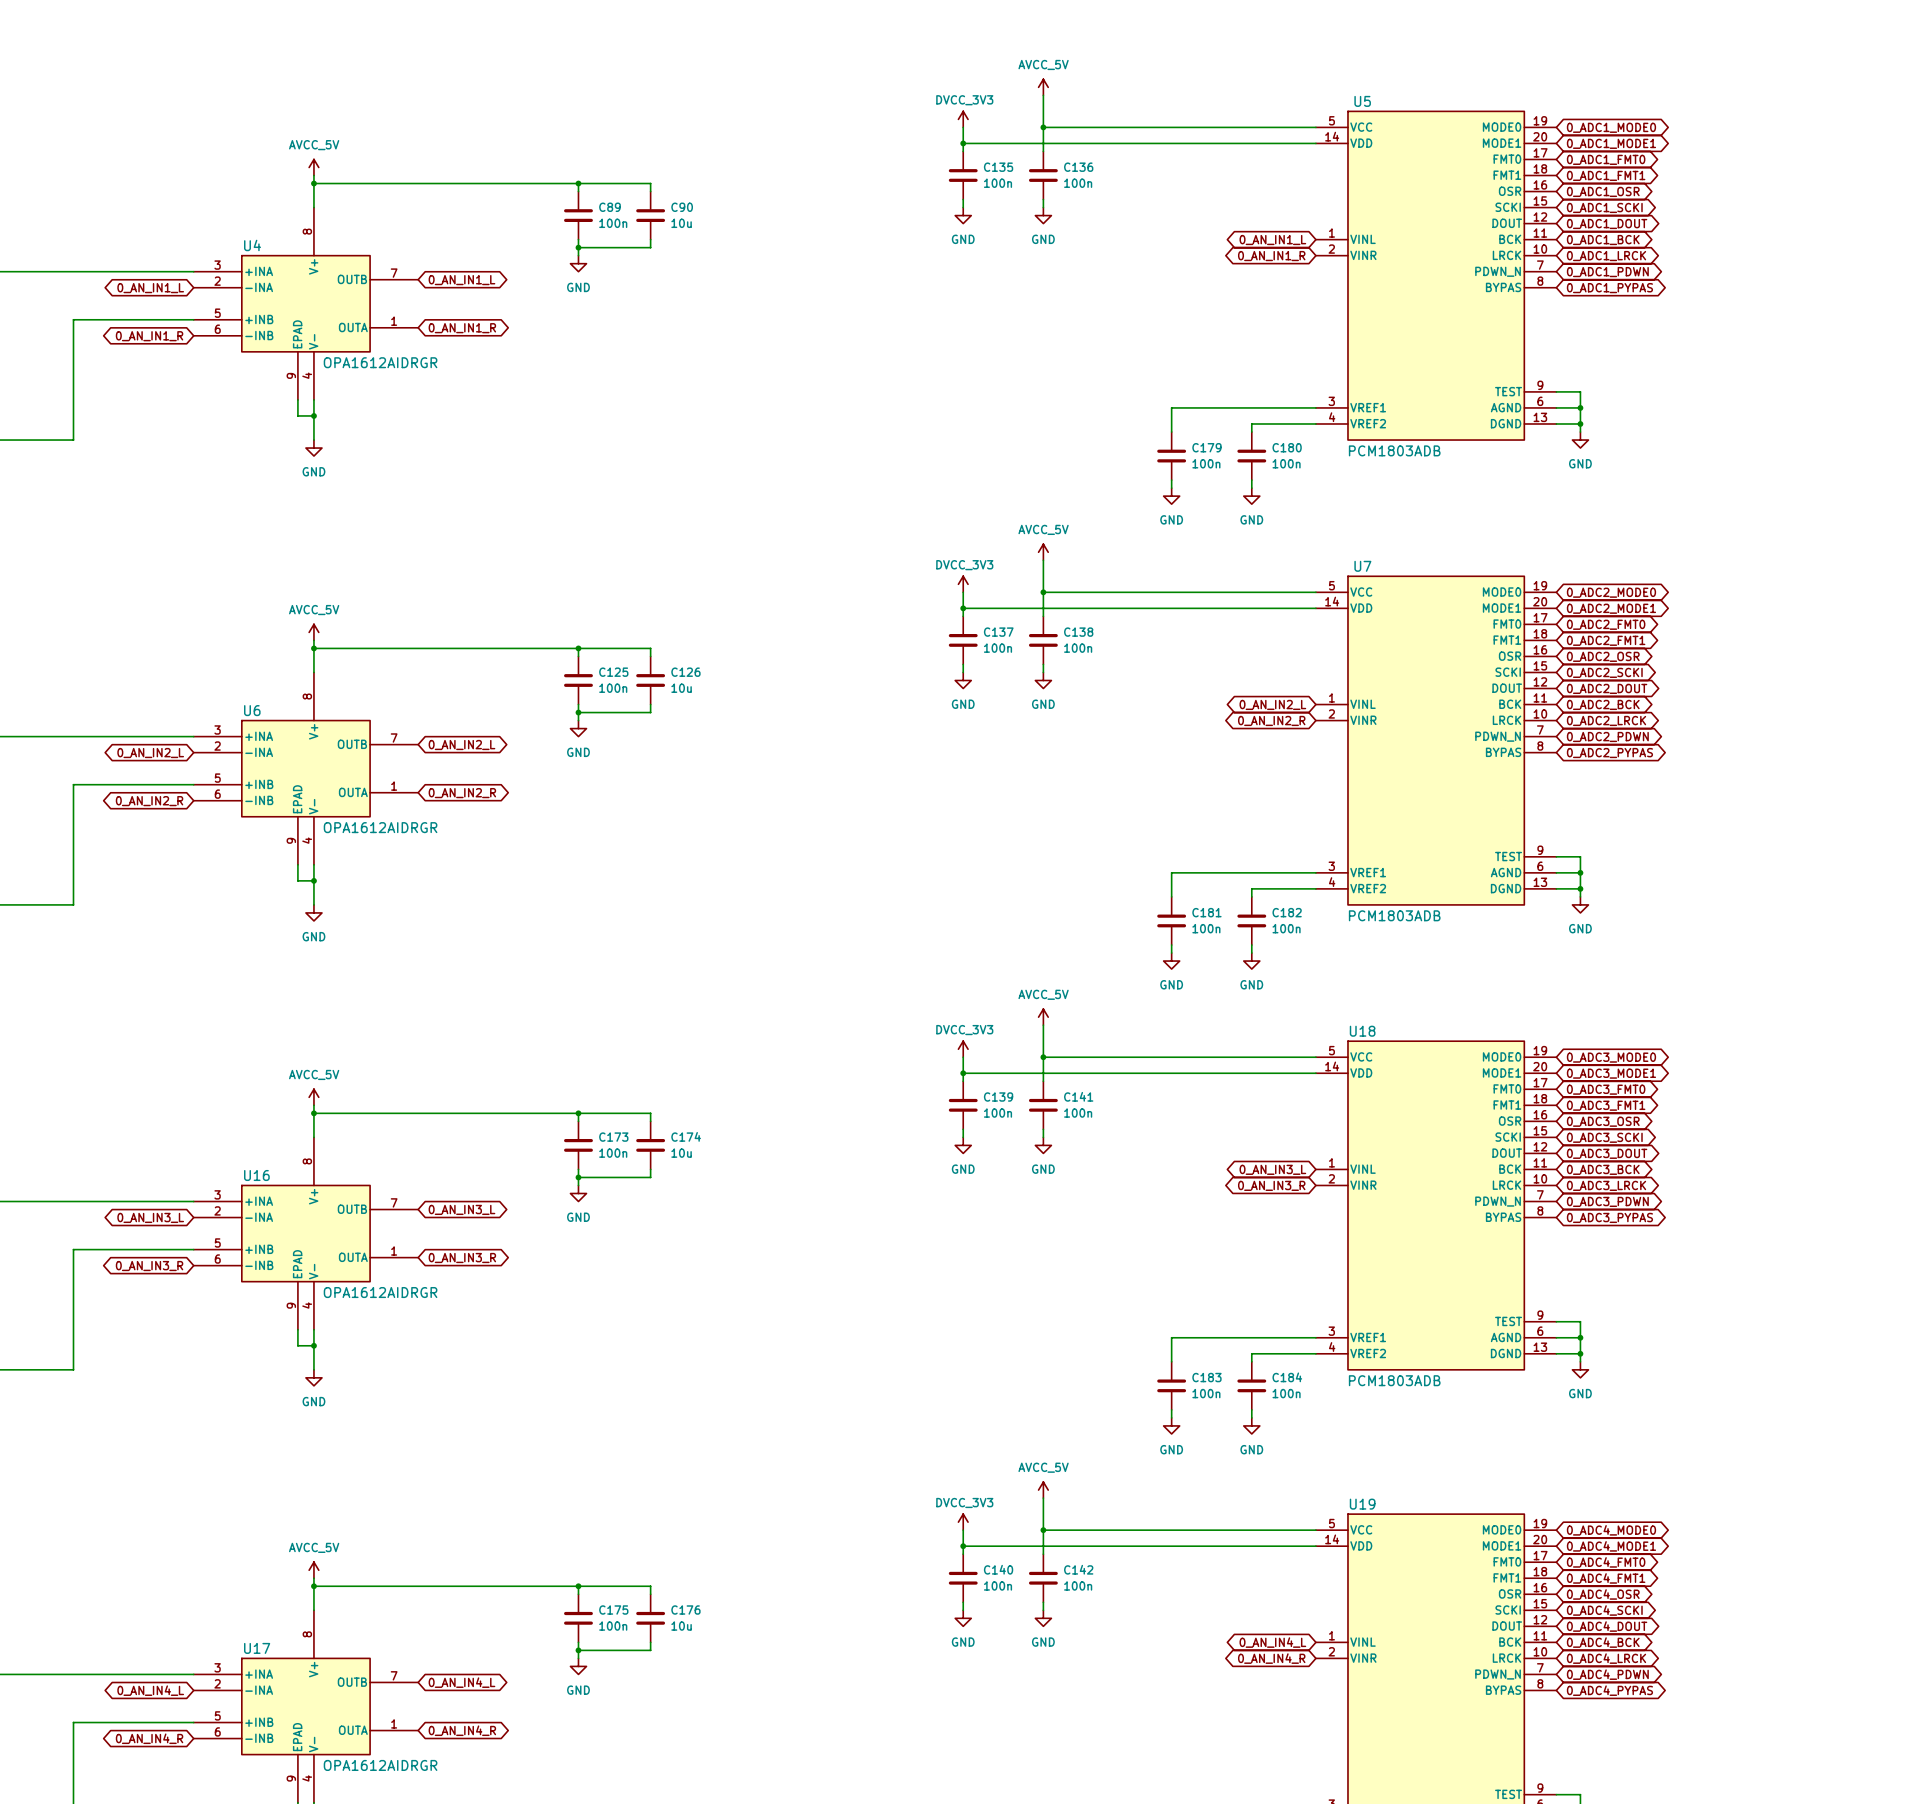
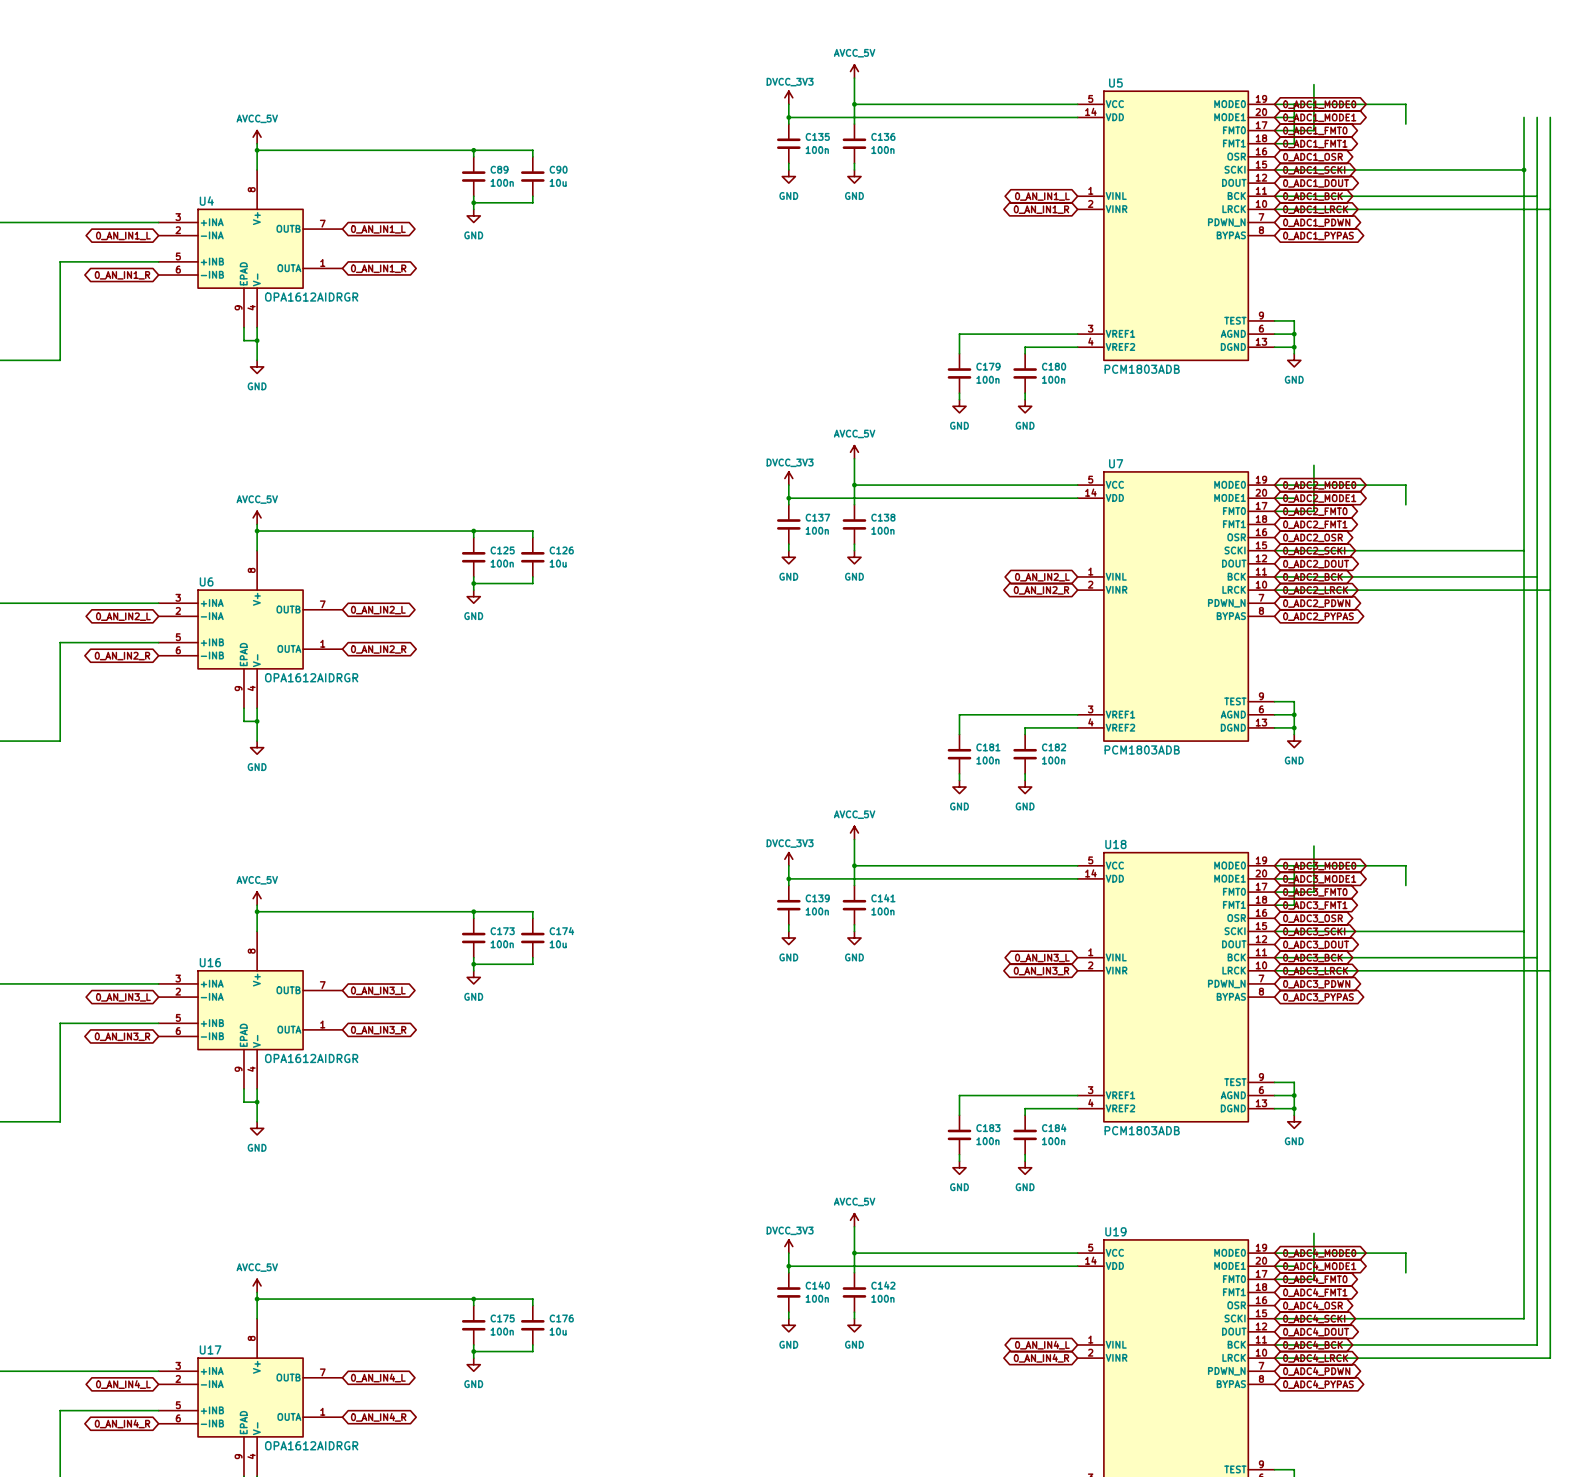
wire: none -> (1313, 84) (1313, 130) (1274, 130)
wire: none -> (1274, 104) (1405, 104) (1405, 124)
wire: none -> (1294, 104) (1294, 143) (1274, 143)
wire: none -> (1274, 117) (1294, 117)
wire: none -> (1524, 117) (1524, 1318) (1274, 1318)
wire: none -> (1537, 117) (1537, 1344) (1274, 1344)
wire: none -> (1550, 117) (1550, 1358) (1274, 1358)
wire: none -> (1274, 169) (1524, 169)
junction: none -> (1524, 169)
wire: none -> (1274, 196) (1537, 196)
wire: none -> (1274, 209) (1550, 209)
wire: none -> (1313, 465) (1313, 511) (1274, 511)
wire: none -> (1274, 485) (1405, 485) (1405, 504)
wire: none -> (1274, 498) (1294, 498)
wire: none -> (1274, 550) (1524, 550)
wire: none -> (1274, 576) (1537, 576)
wire: none -> (1274, 590) (1550, 590)
wire: none -> (1313, 846) (1313, 892) (1274, 892)
wire: none -> (1274, 865) (1405, 865) (1405, 885)
wire: none -> (1294, 865) (1294, 905) (1274, 905)
wire: none -> (1274, 878) (1294, 878)
wire: none -> (1274, 931) (1524, 931)
wire: none -> (1274, 957) (1537, 957)
wire: none -> (1274, 970) (1550, 970)
wire: none -> (1313, 1233) (1313, 1279) (1274, 1279)
wire: none -> (1274, 1253) (1405, 1253) (1405, 1272)
wire: none -> (1274, 1266) (1294, 1266)

